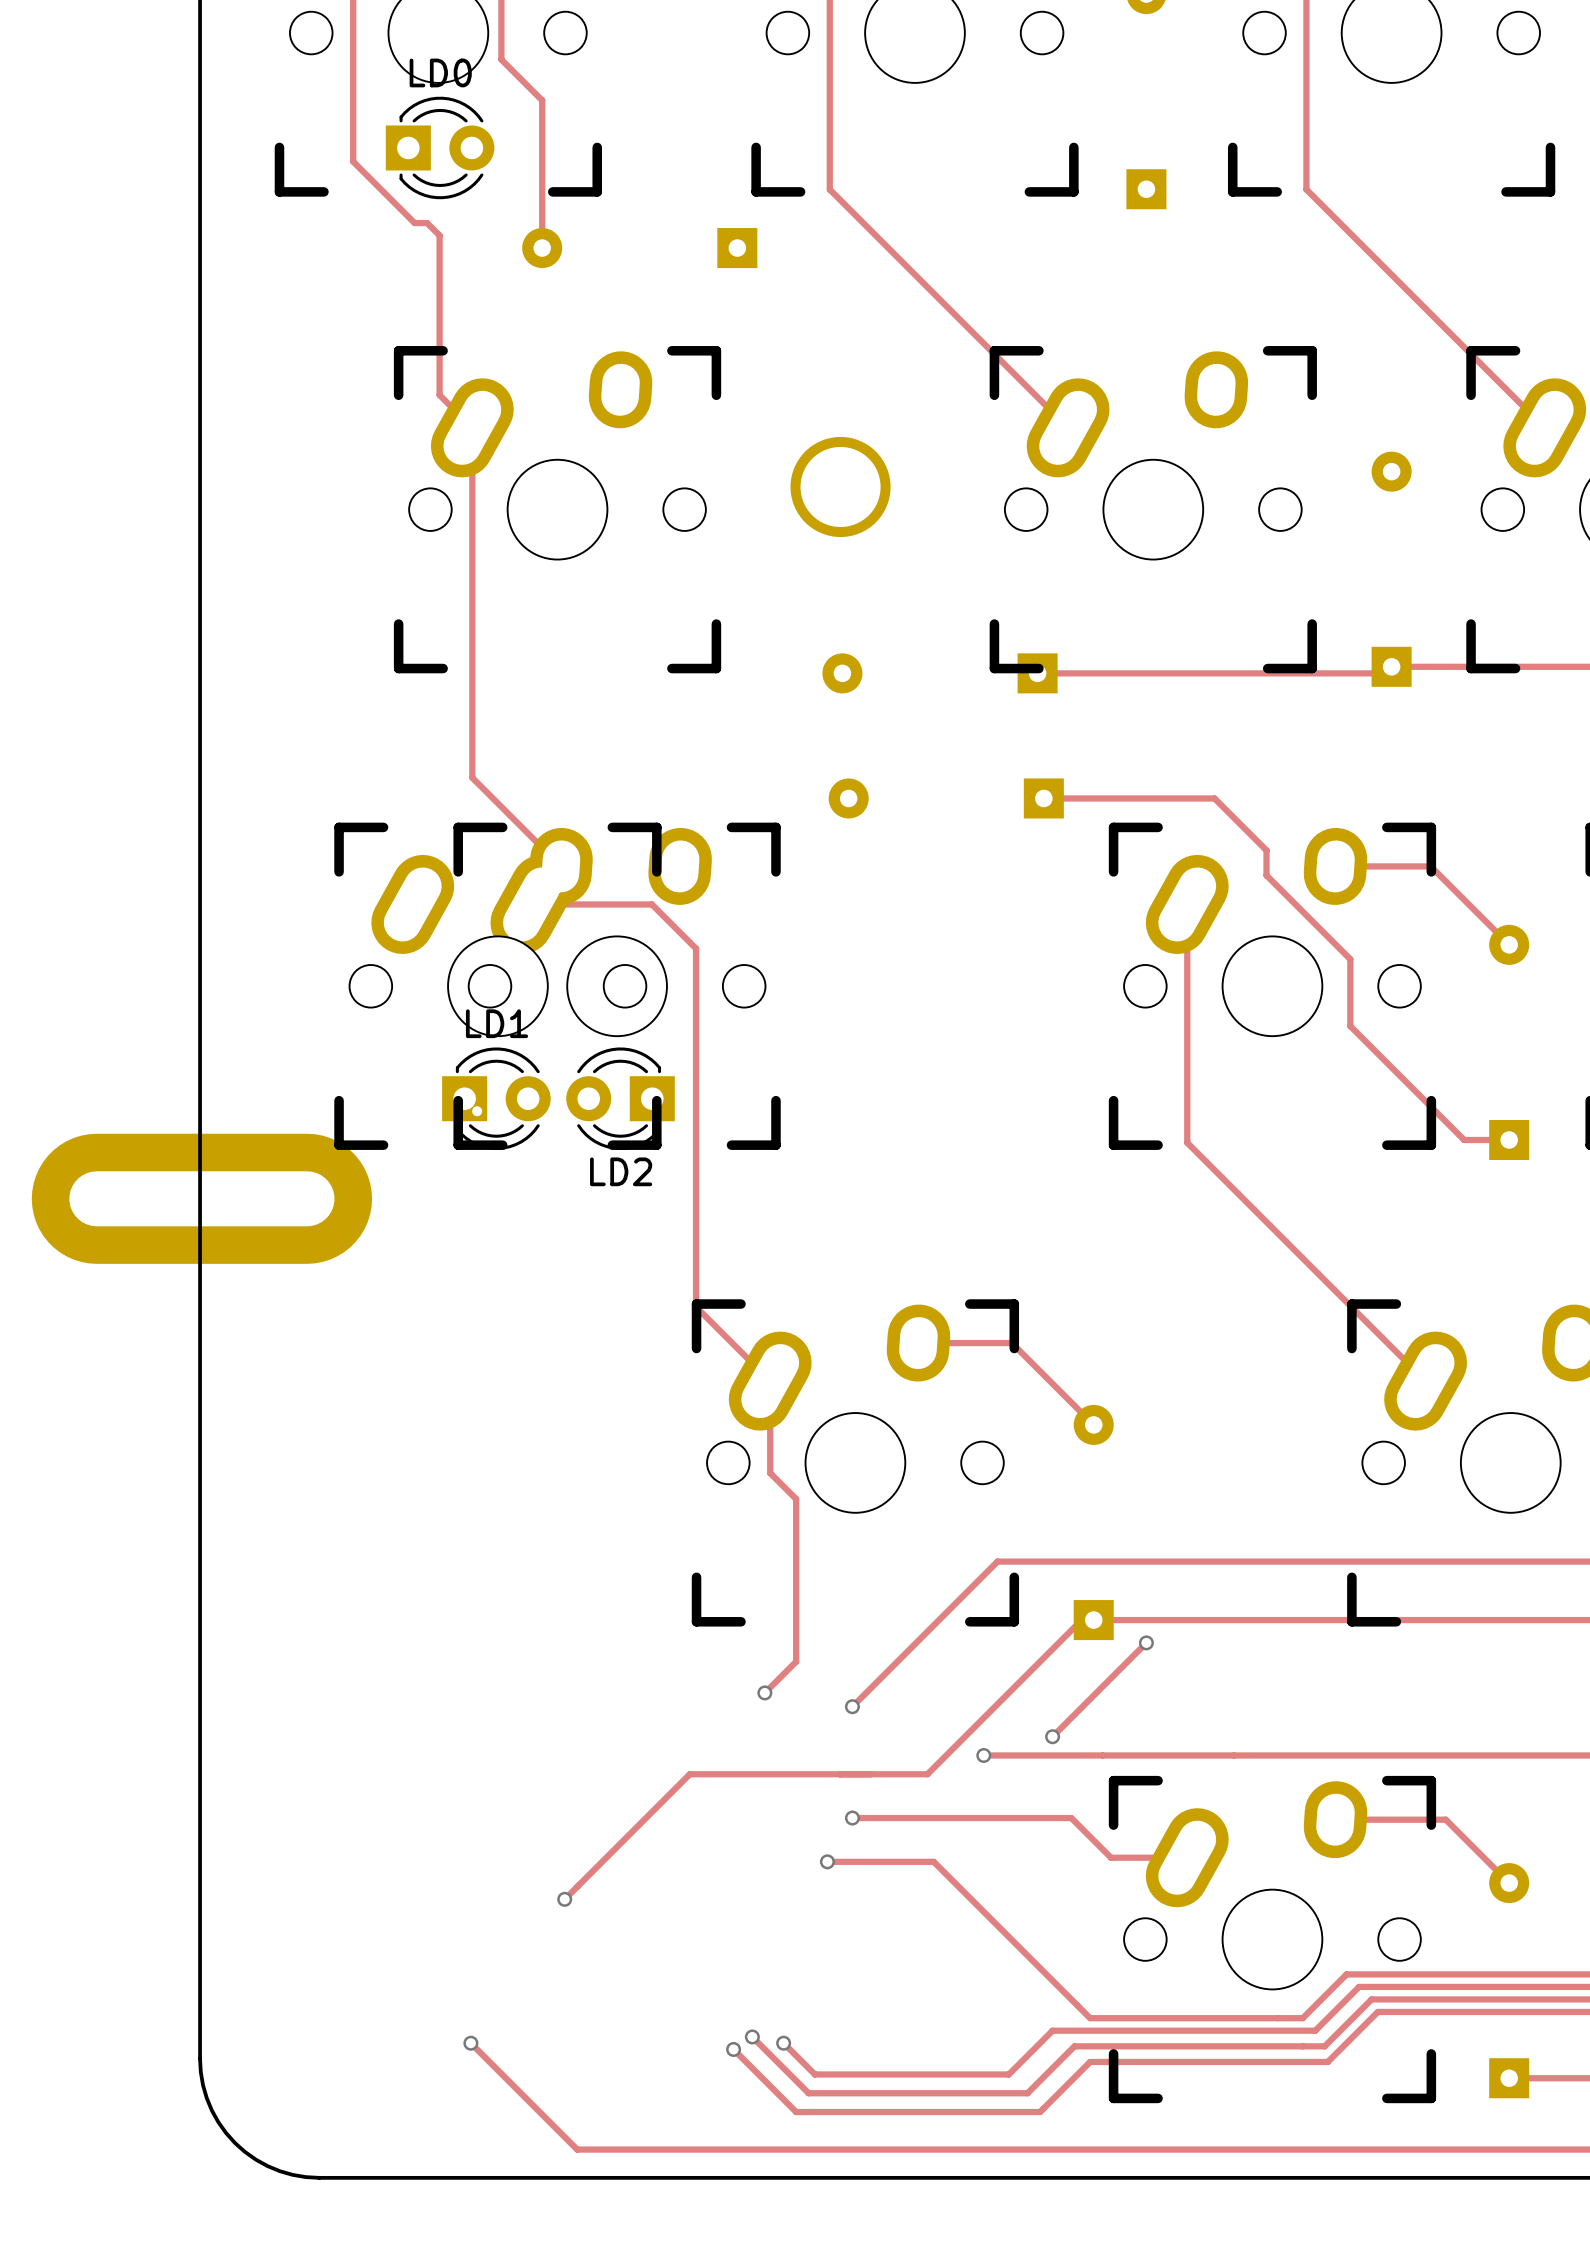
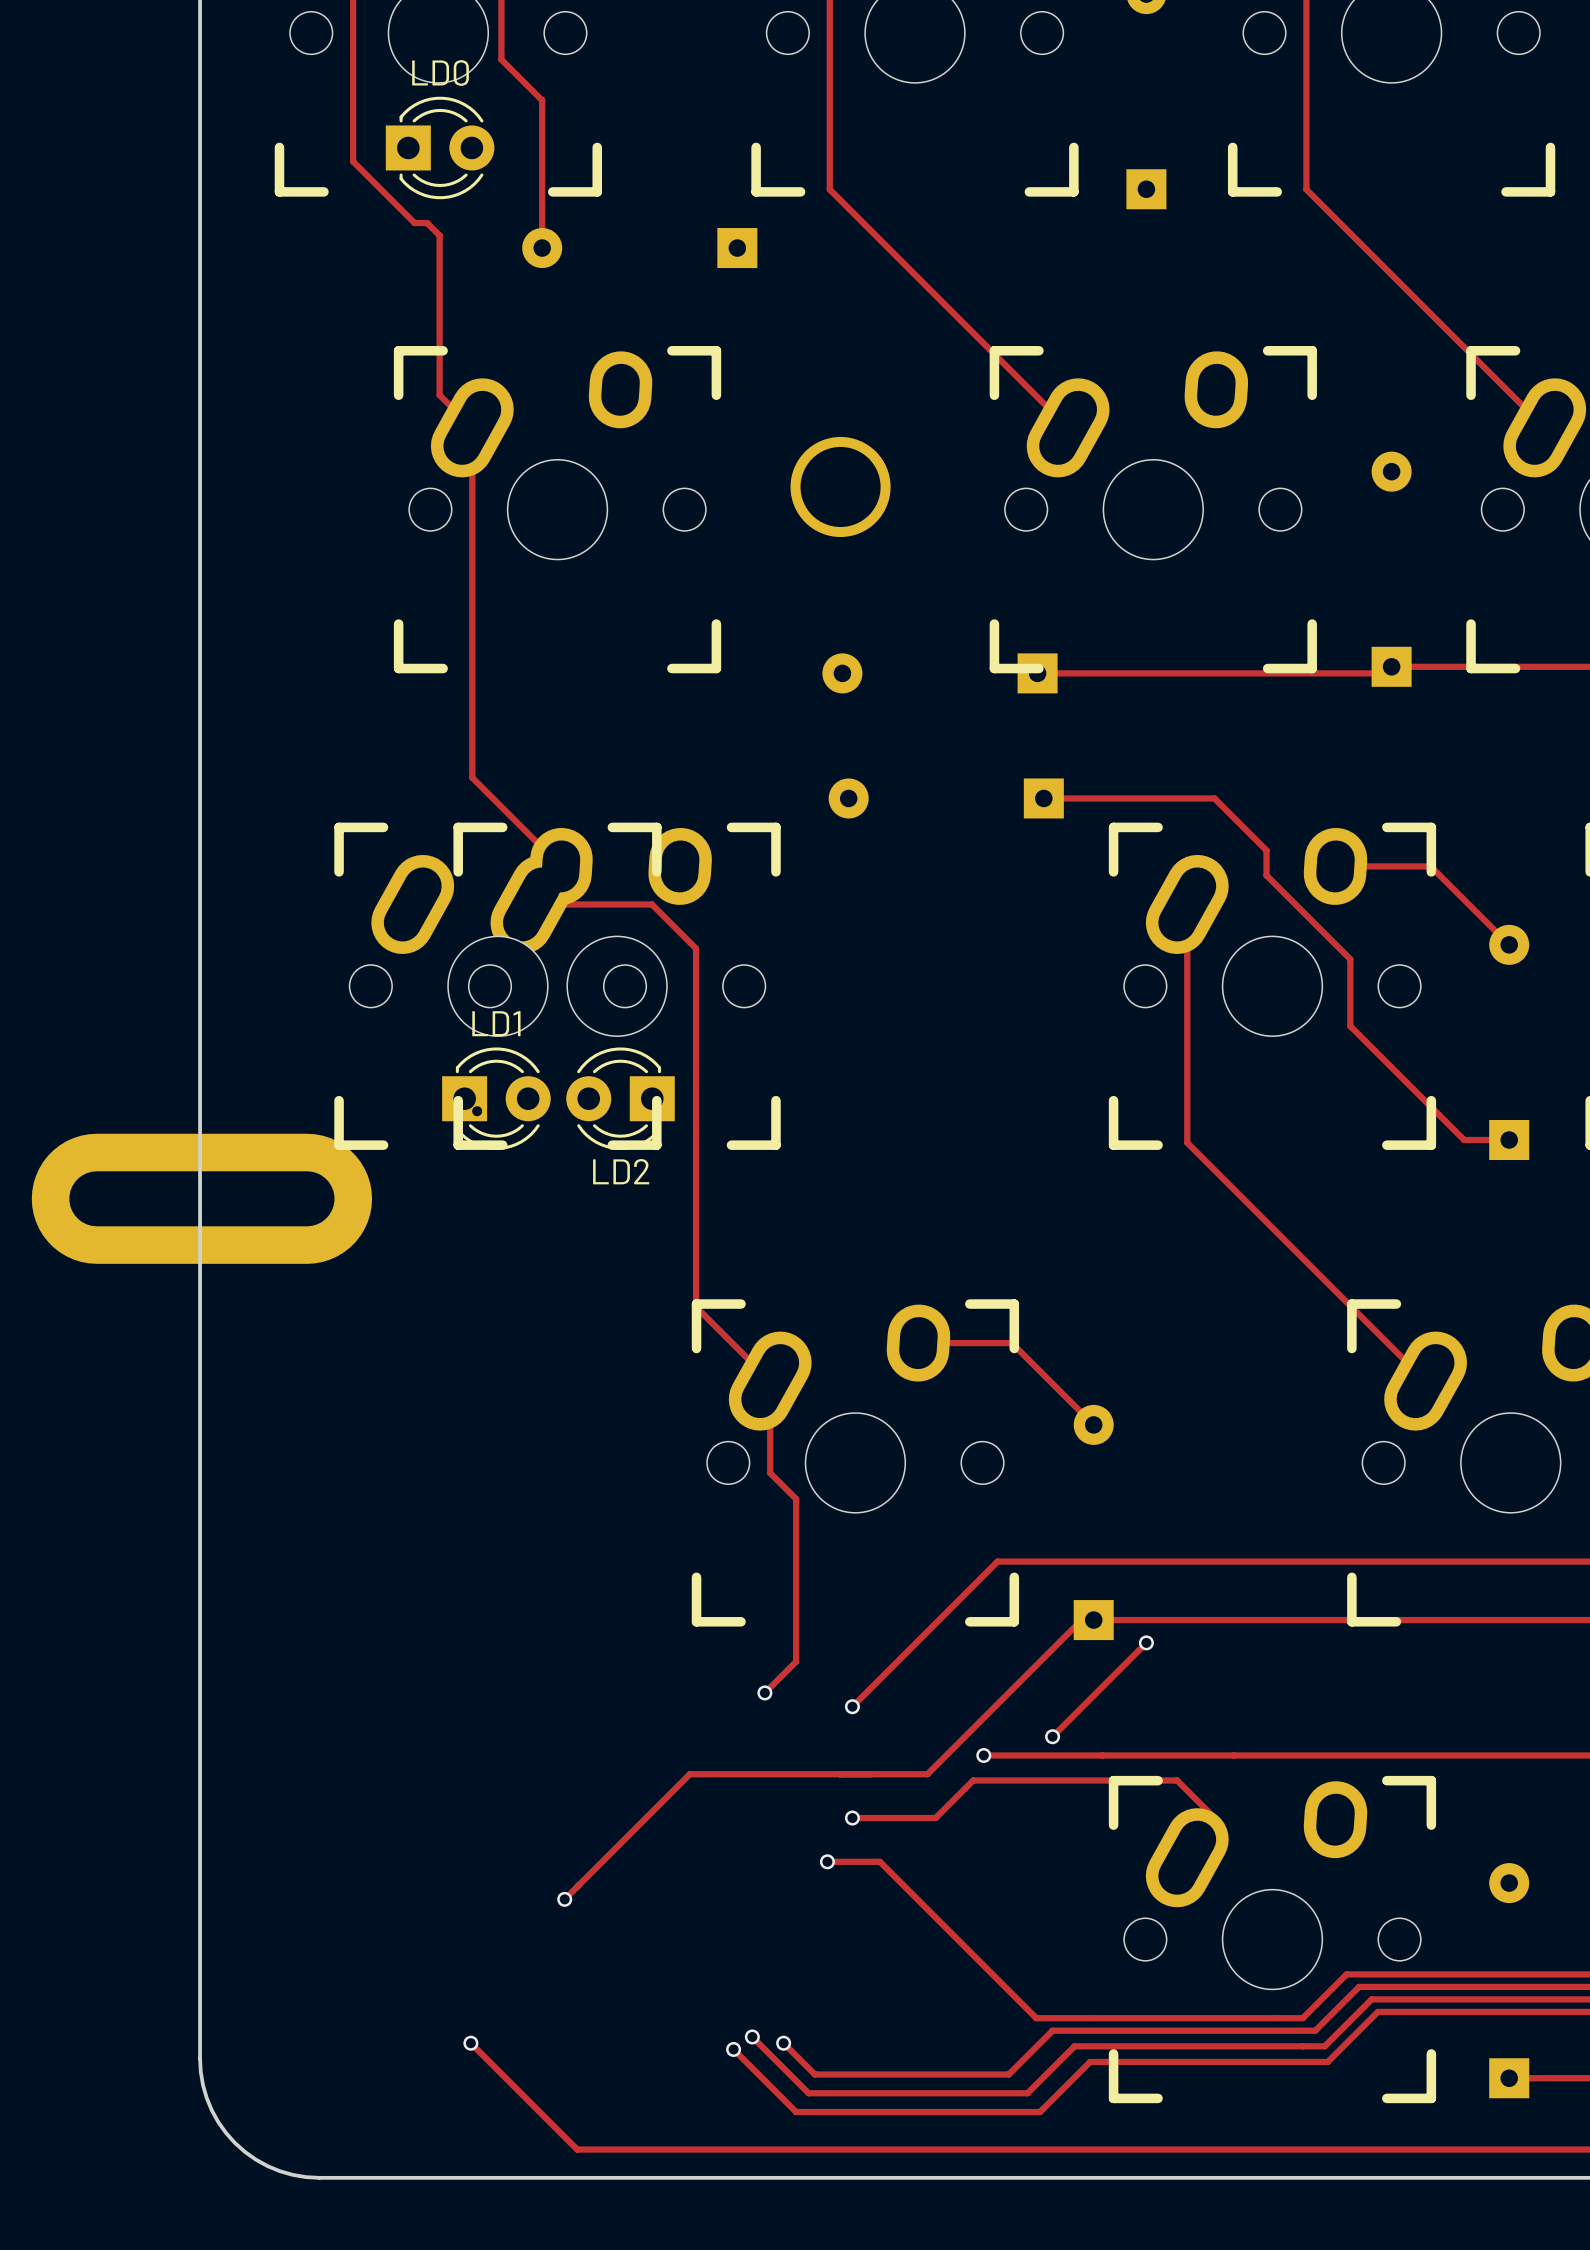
track: (935, 1818) (1071, 1818) (1111, 1857) (1187, 1857) (1187, 1840) -> (935, 1818) (973, 1780) (1177, 1780) (1216, 1819) (1187, 1857)
track: (1335, 1819) (1445, 1819) (1509, 1883) -> none
track: (879, 1861) (933, 1861) (1090, 2018) -> (879, 1861) (1036, 2018) (1090, 2018)

